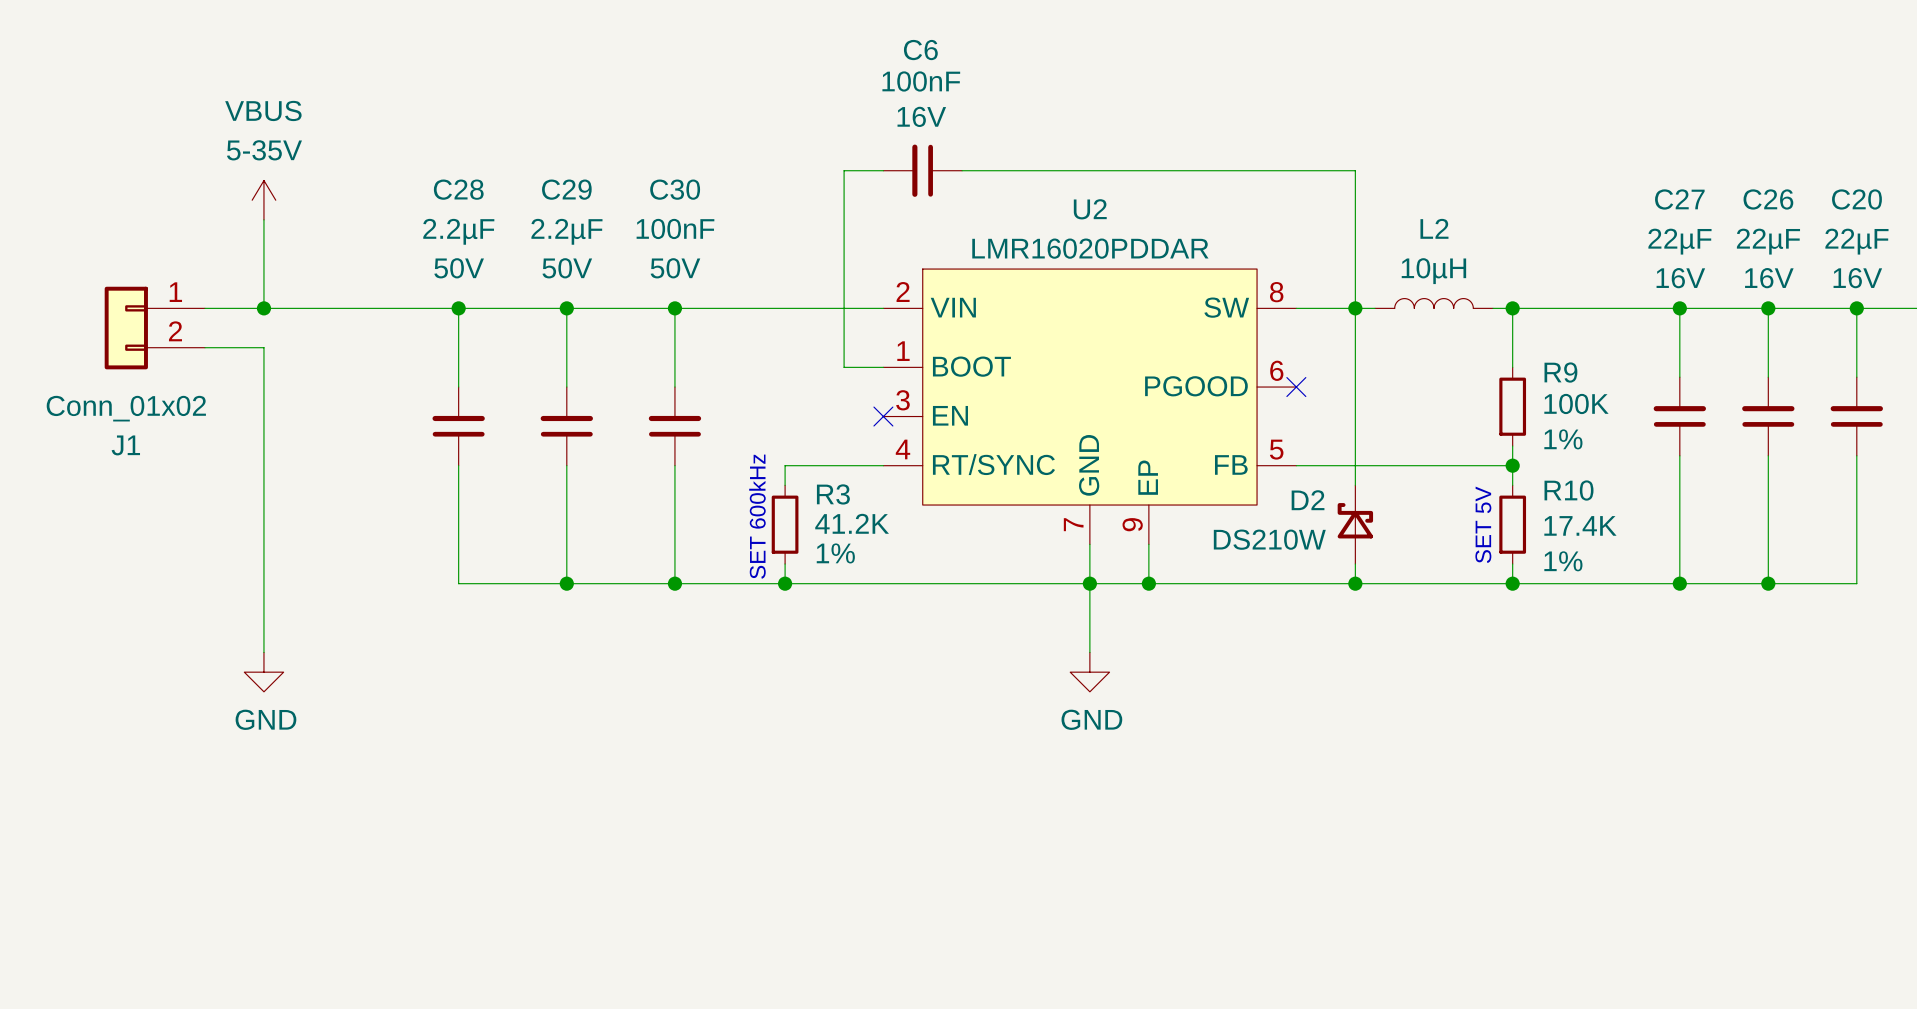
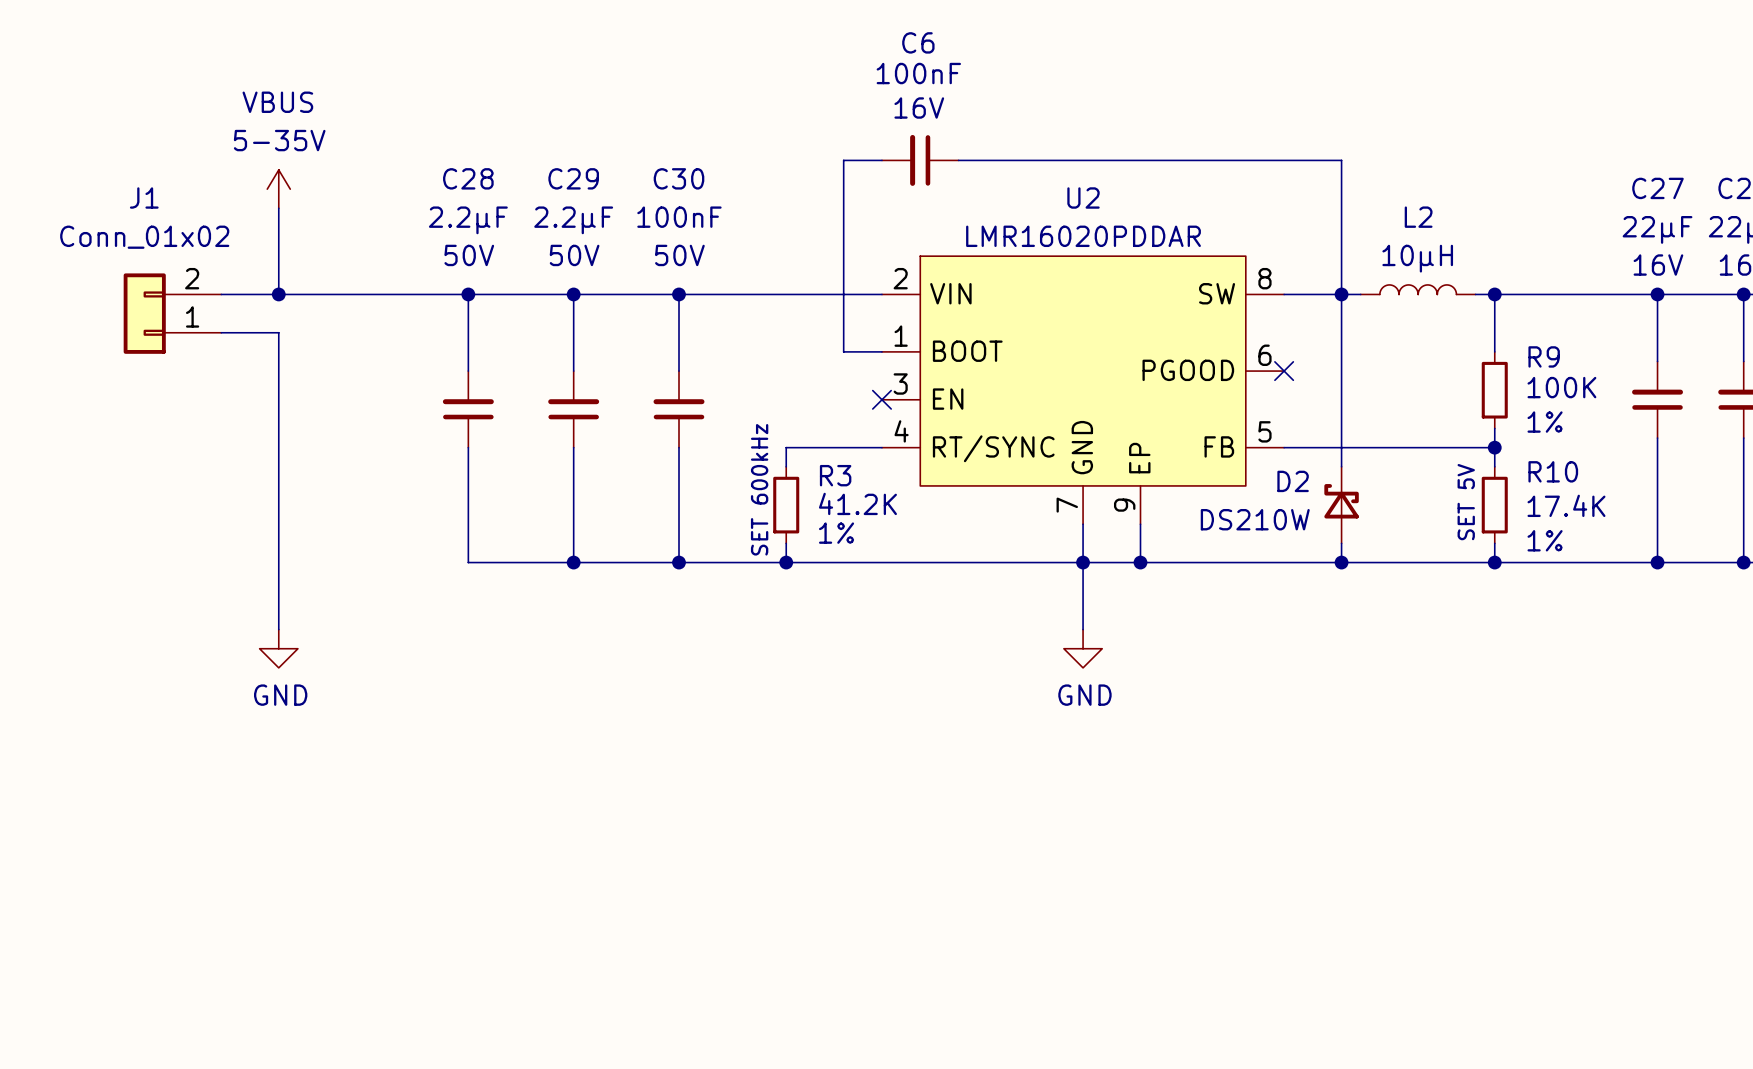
J1 flip: as is (126, 328) -> up-down (144, 313)

